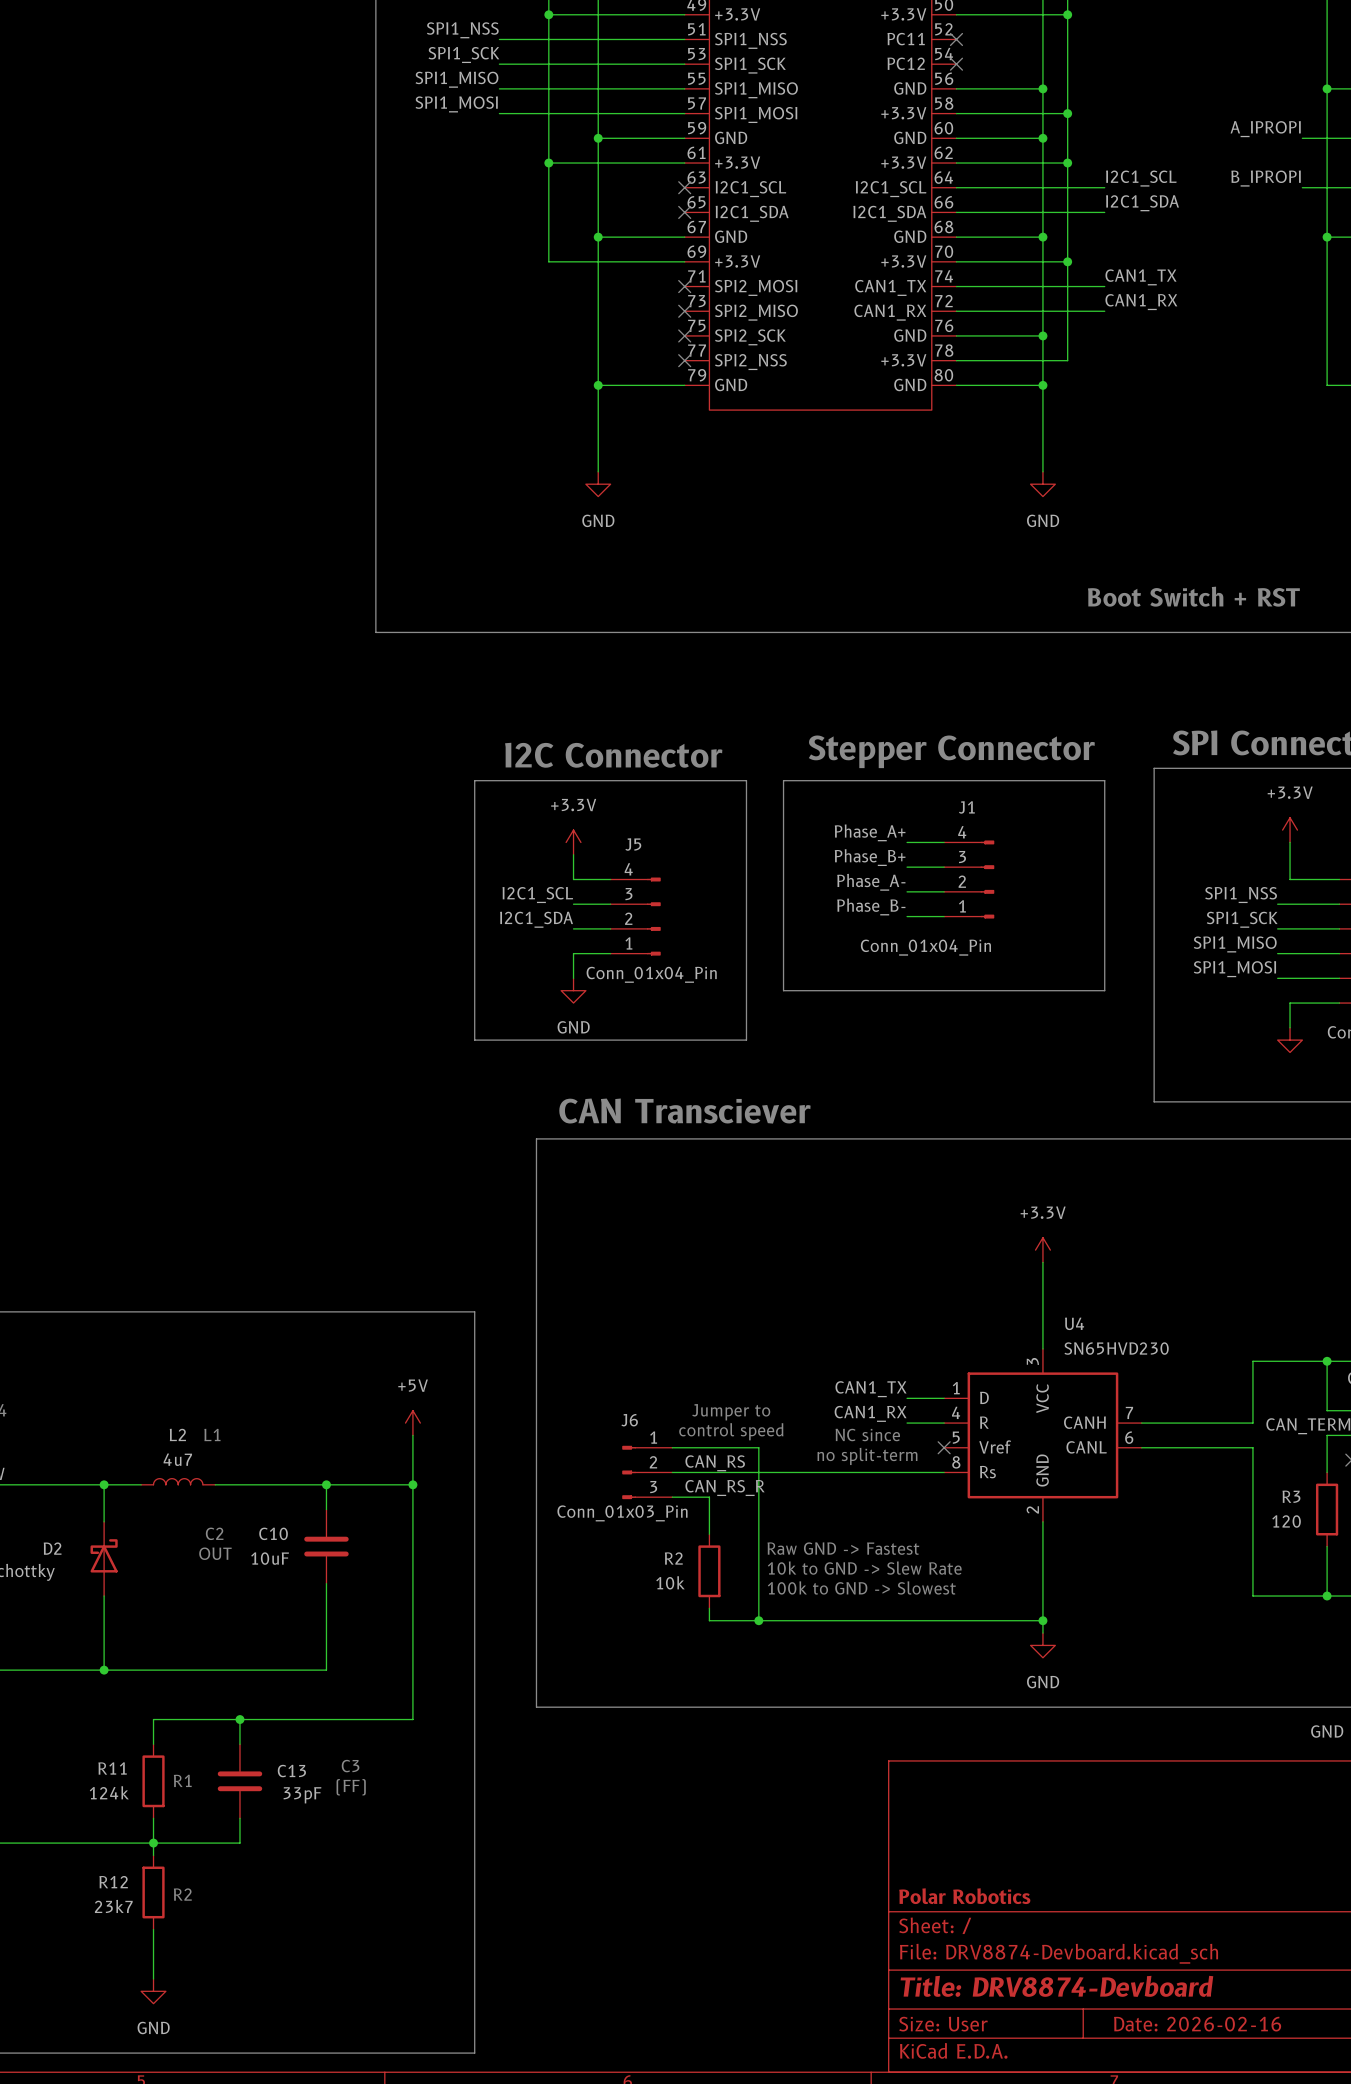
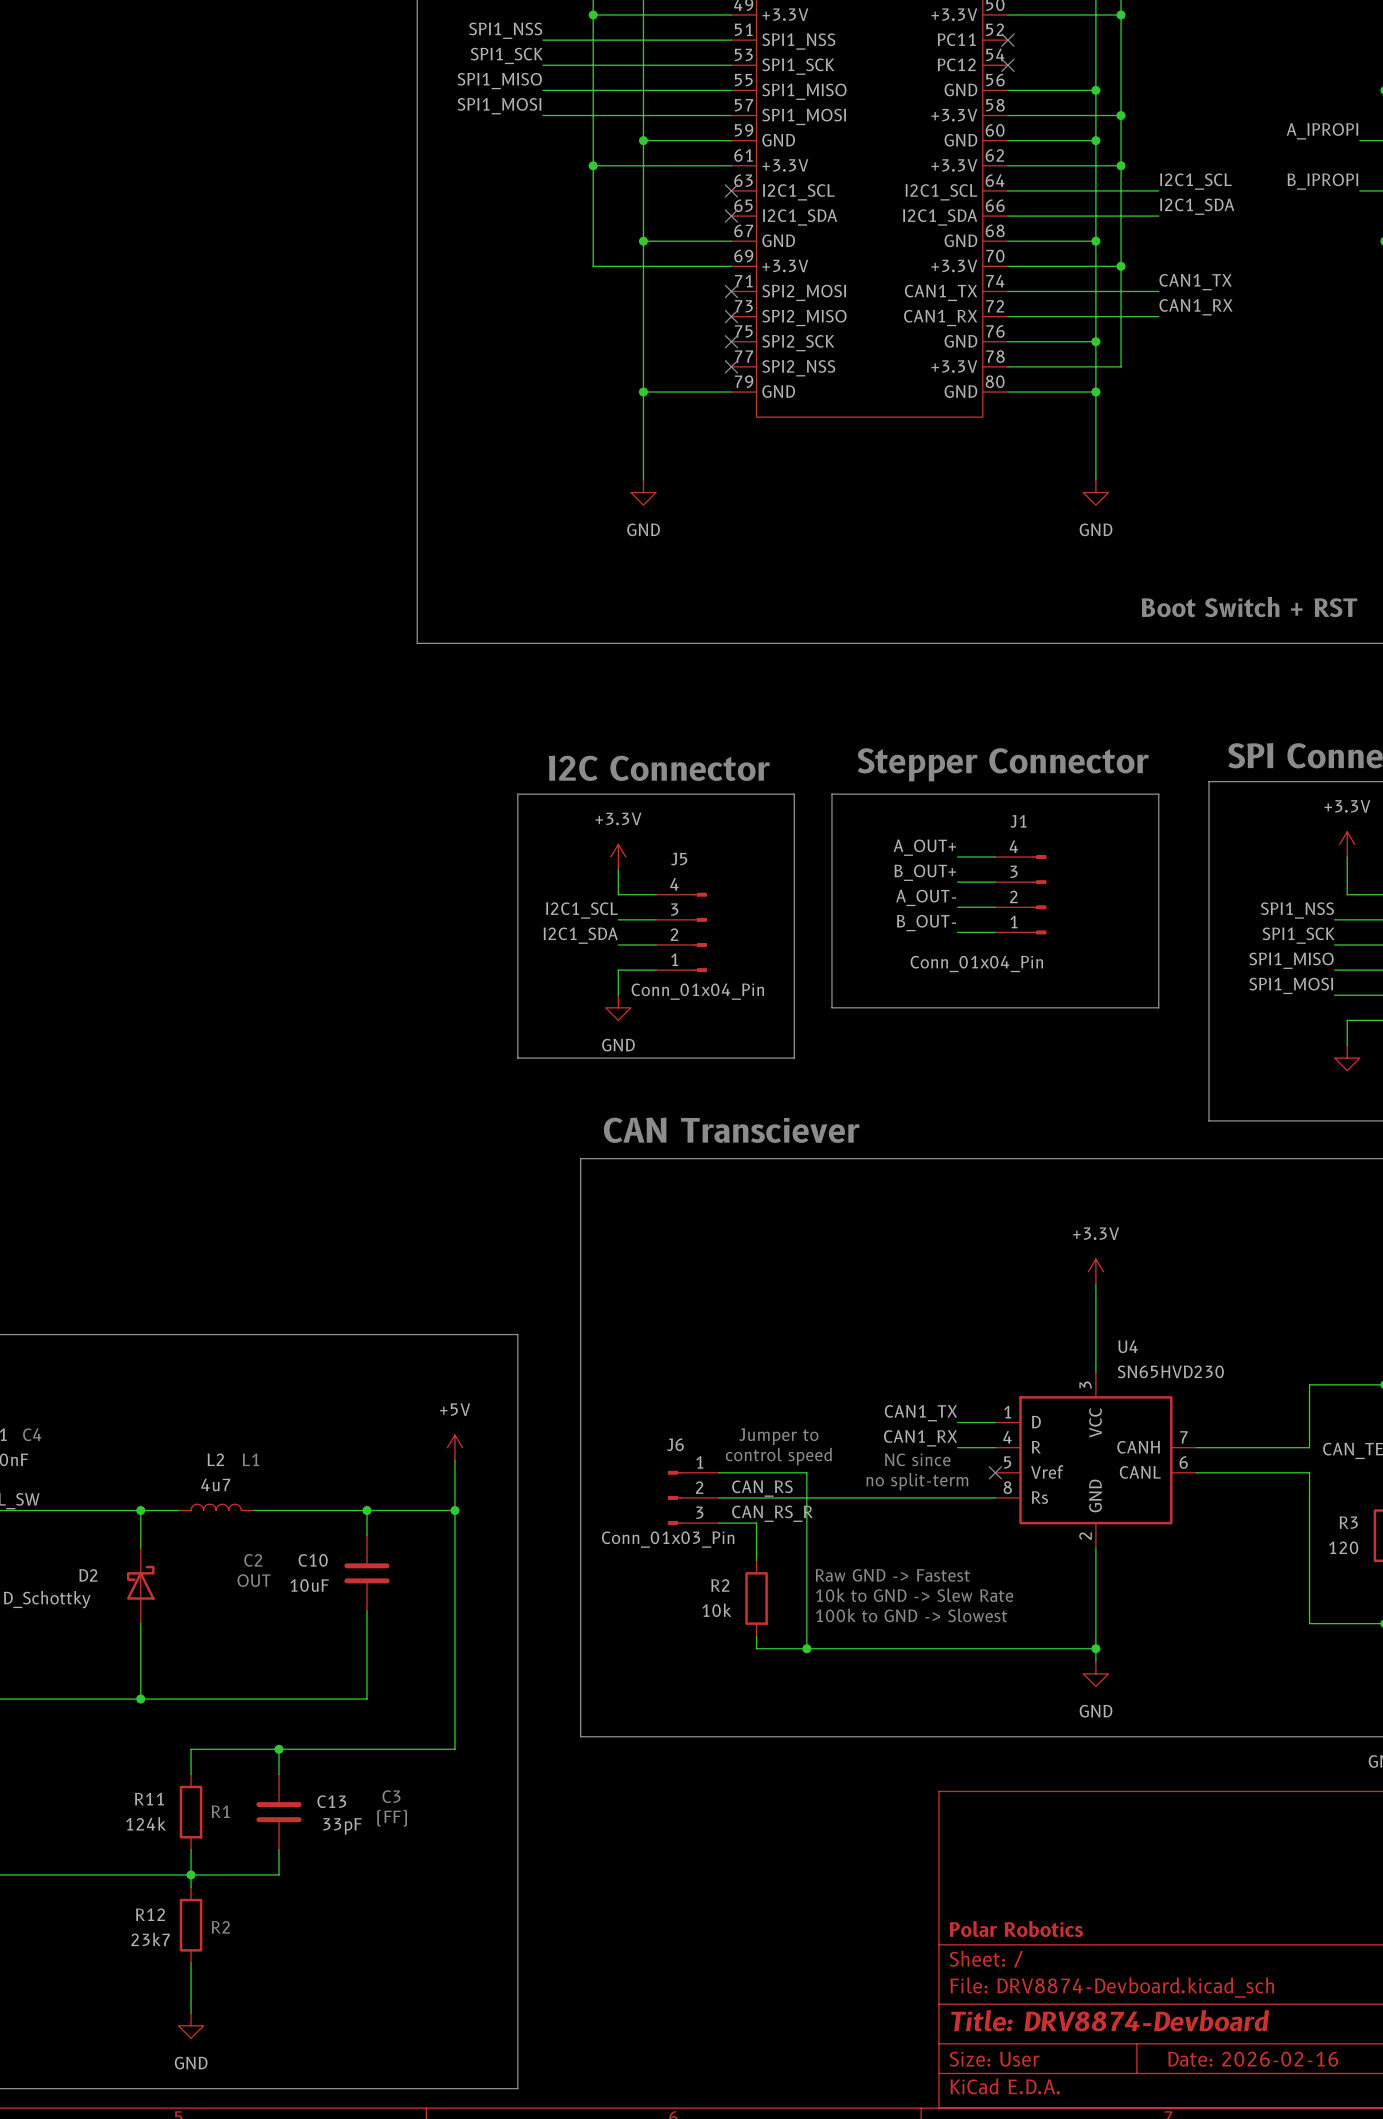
label: Phase_A+ (870, 832) -> A_OUT+ (924, 847)
label: Phase_B+ (870, 857) -> B_OUT+ (925, 872)
label: Phase_A- (871, 882) -> A_OUT- (926, 897)
label: Phase_B- (871, 906) -> B_OUT- (926, 923)

